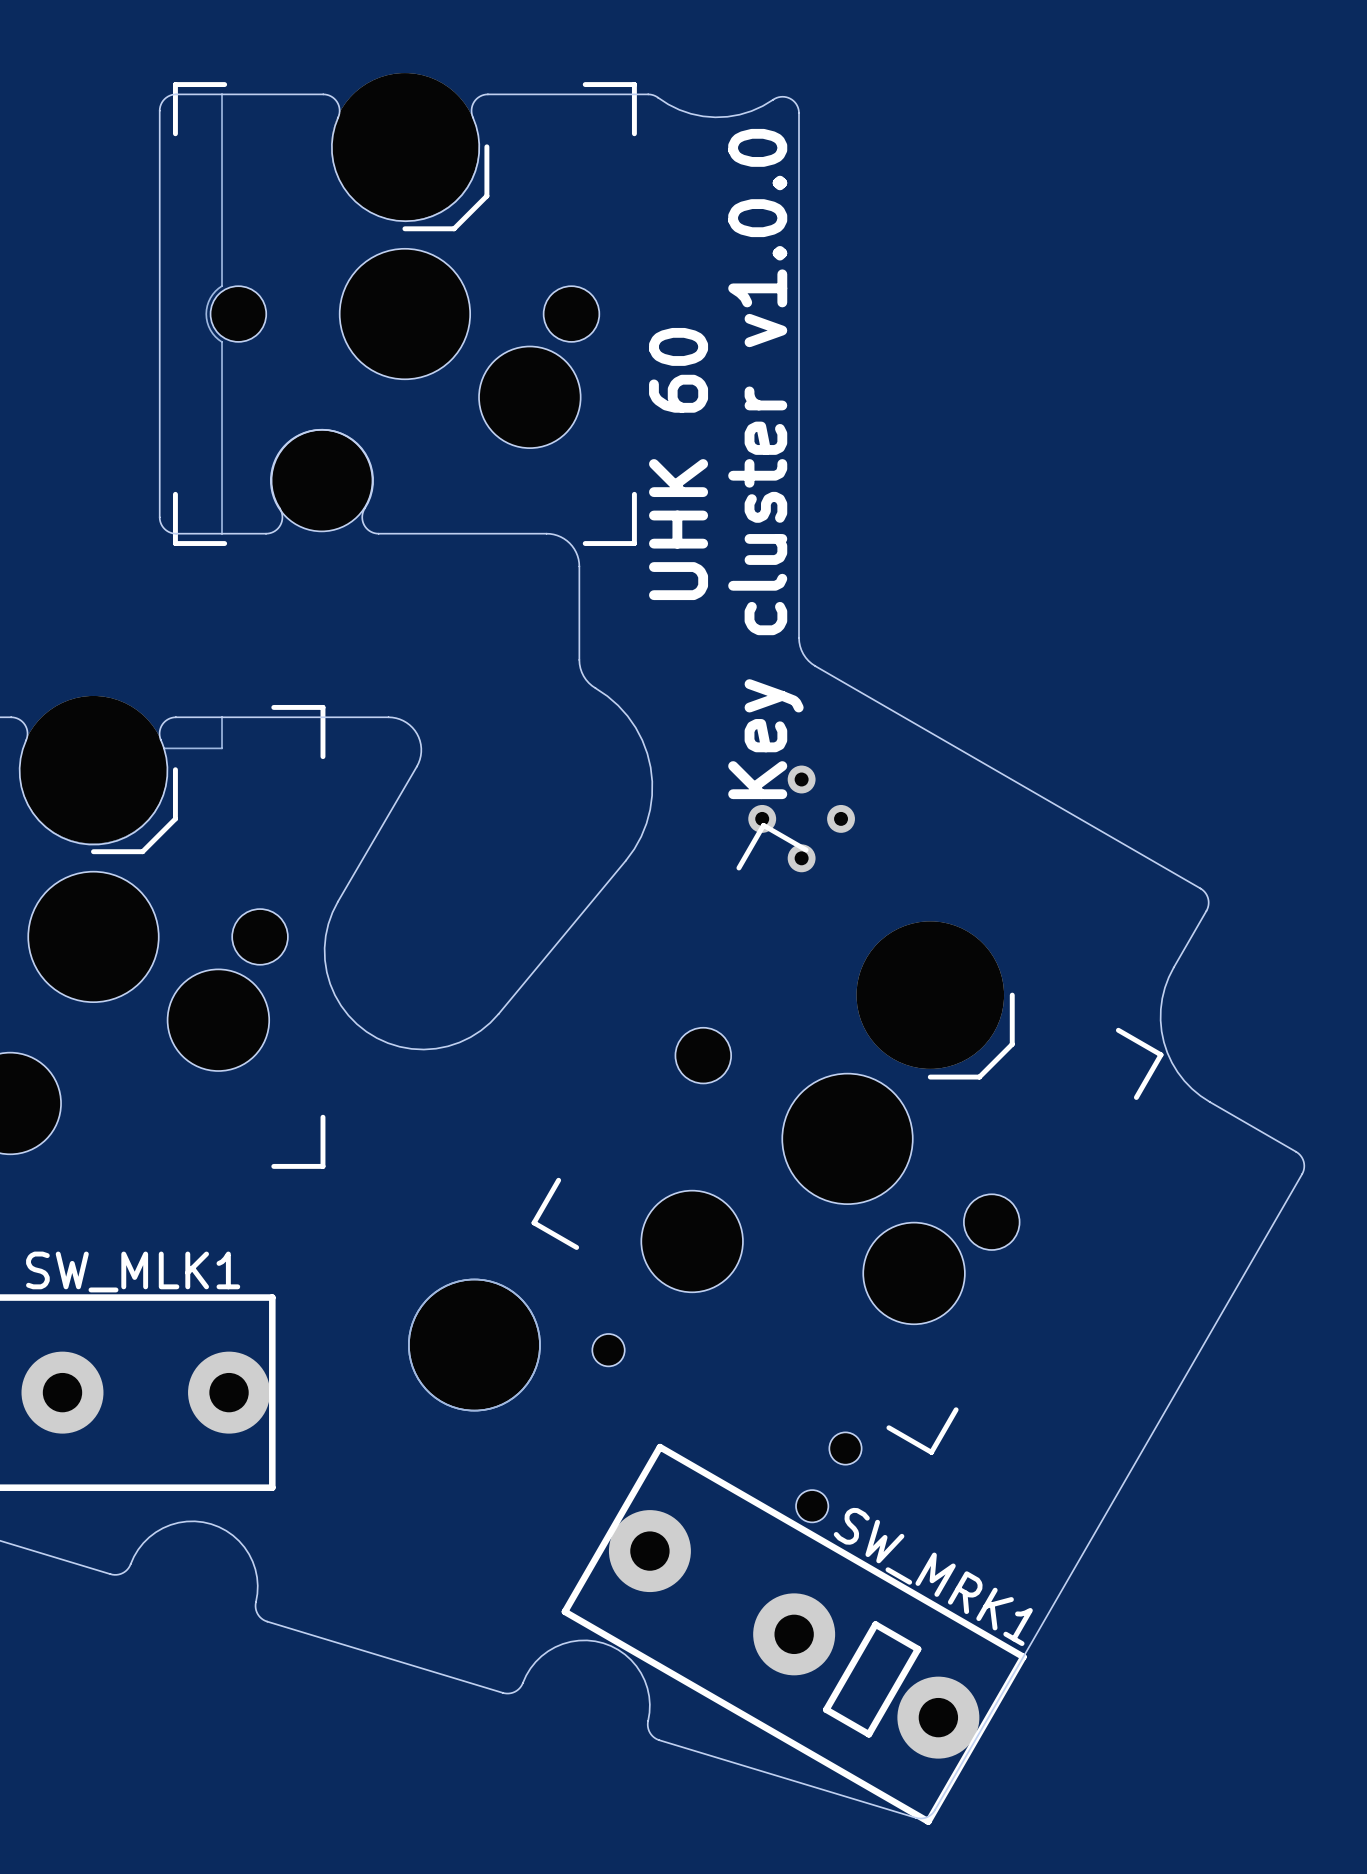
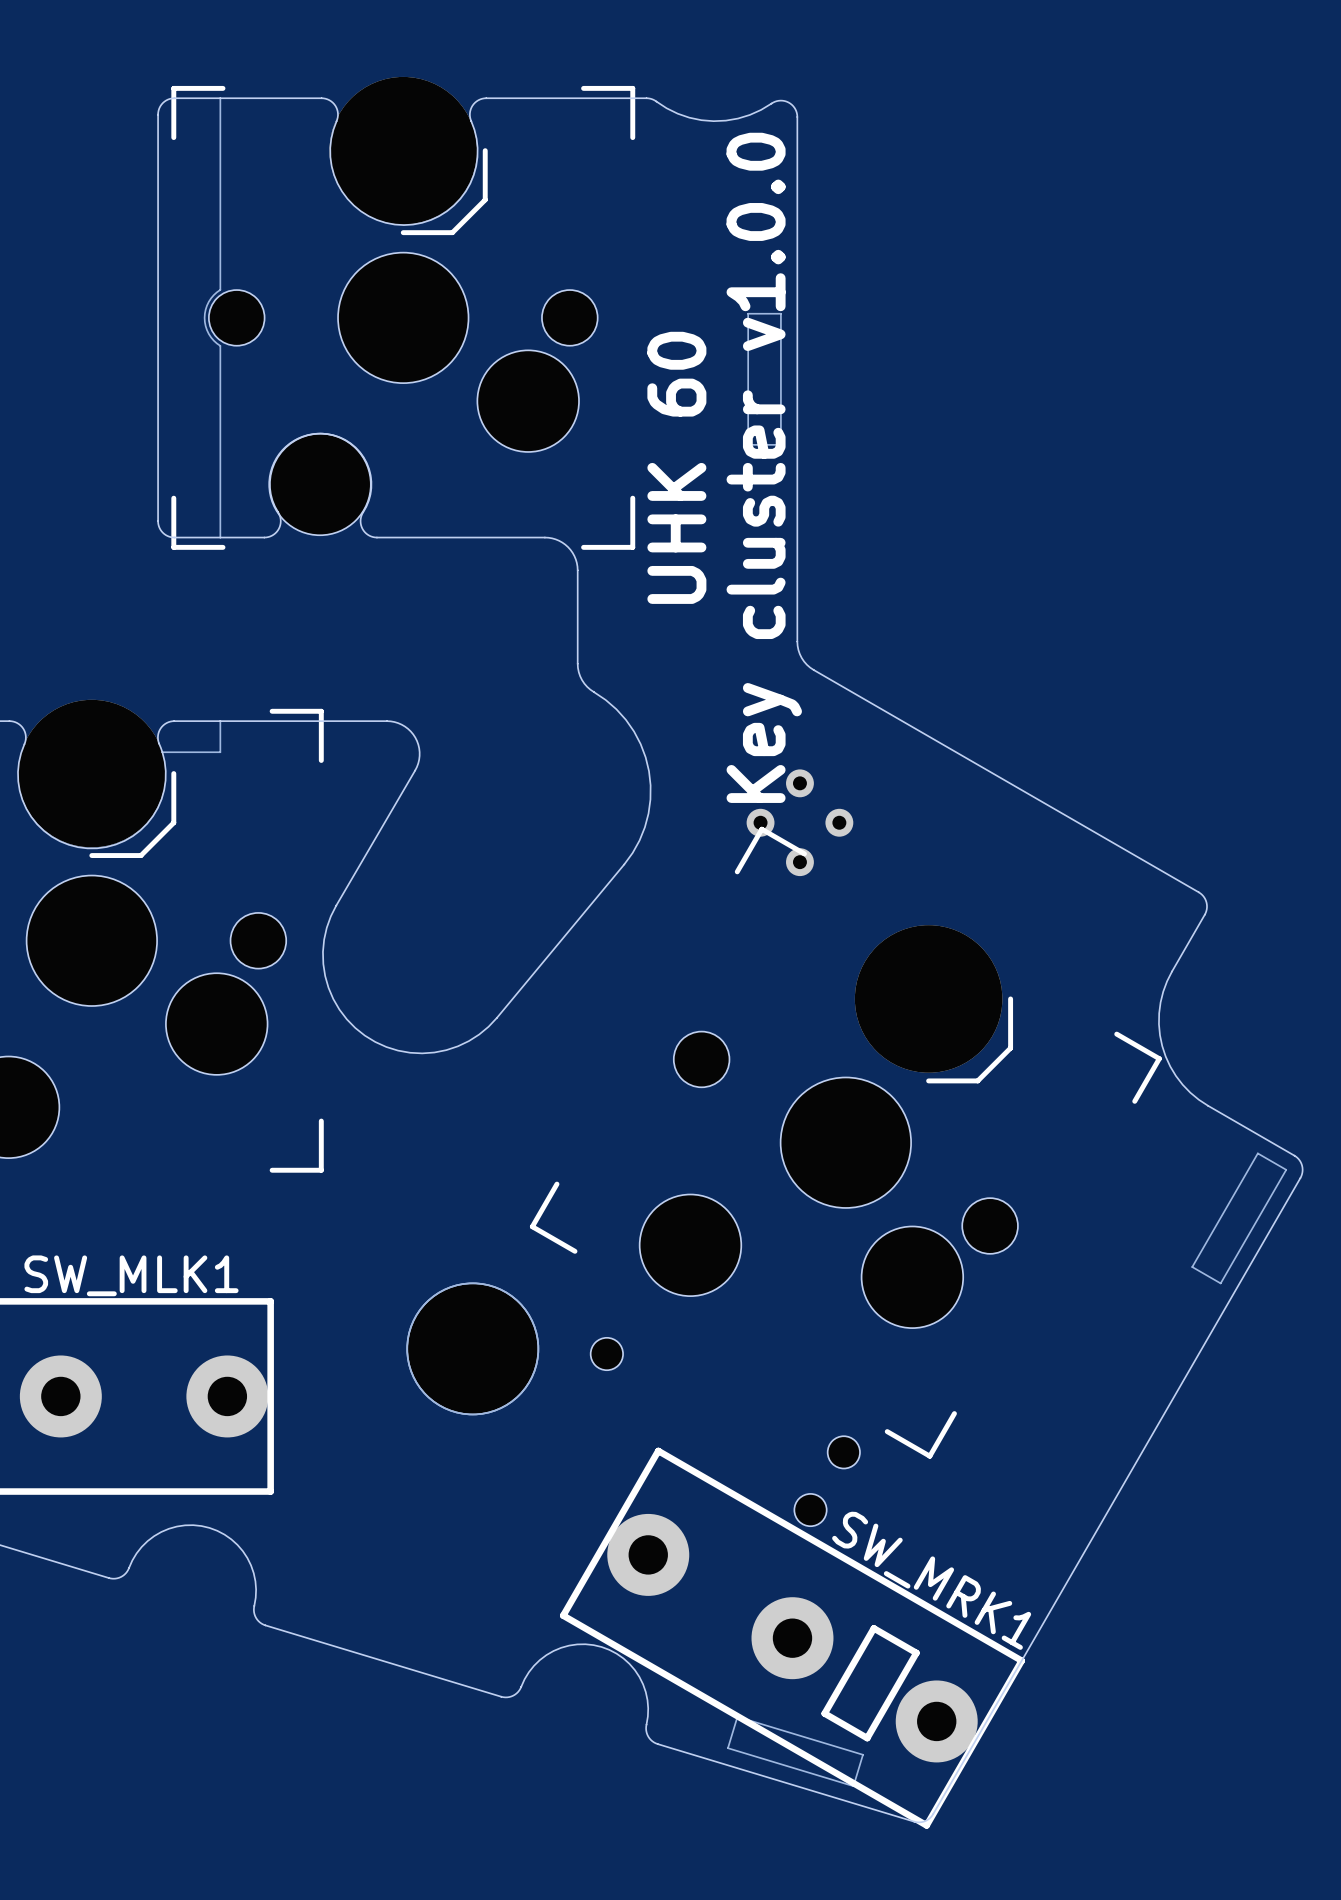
line: none -> (748, 313) (748, 444) (780, 444) (780, 313) (748, 313)
line: none -> (1257, 1153) (1192, 1267) (1220, 1283) (1286, 1169) (1257, 1153)
line: none -> (737, 1716) (862, 1754) (853, 1786) (727, 1748) (737, 1716)

